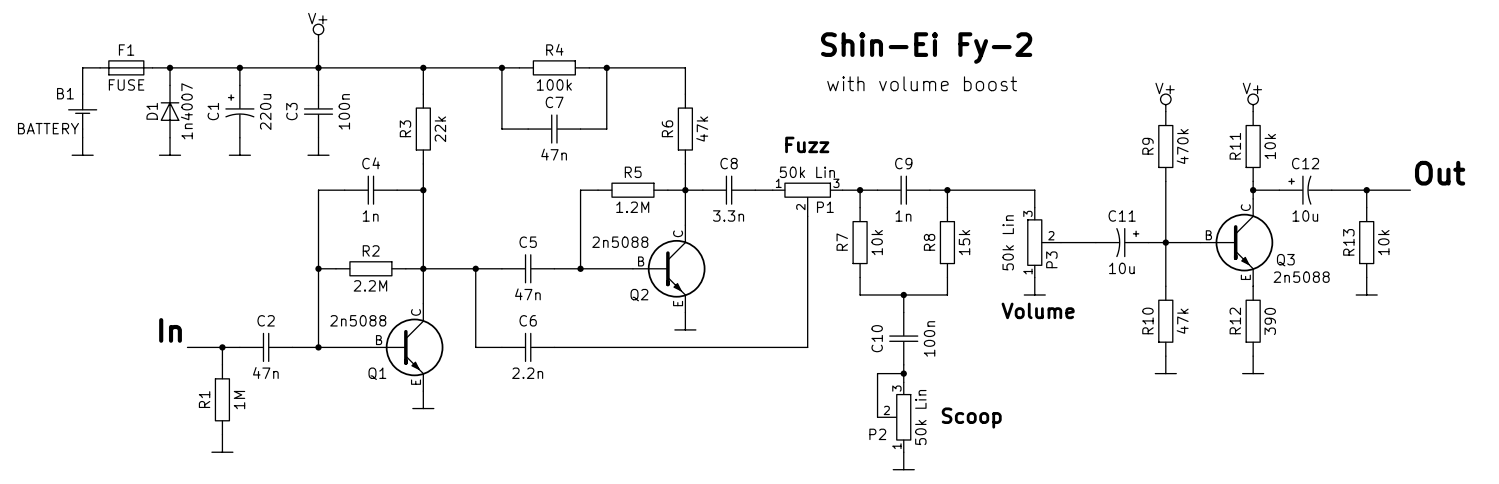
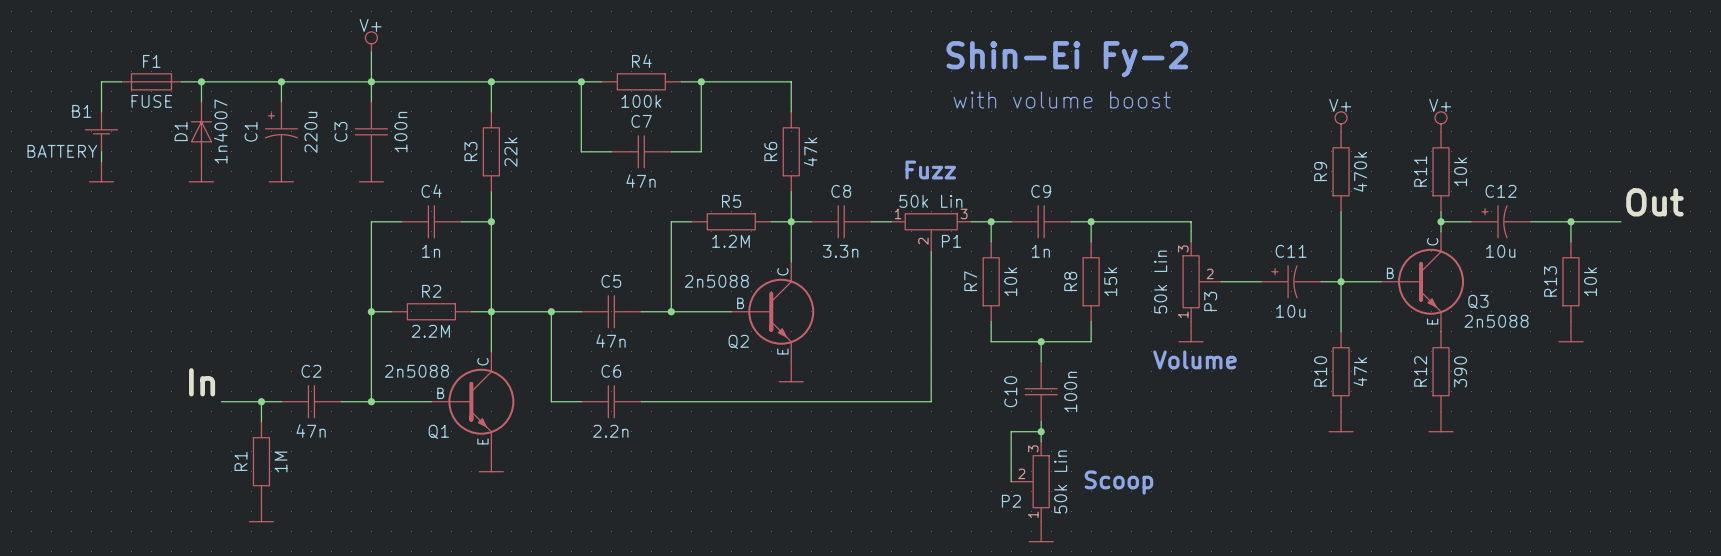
C11 flip: as is (1127, 242) -> left-right (1284, 281)

